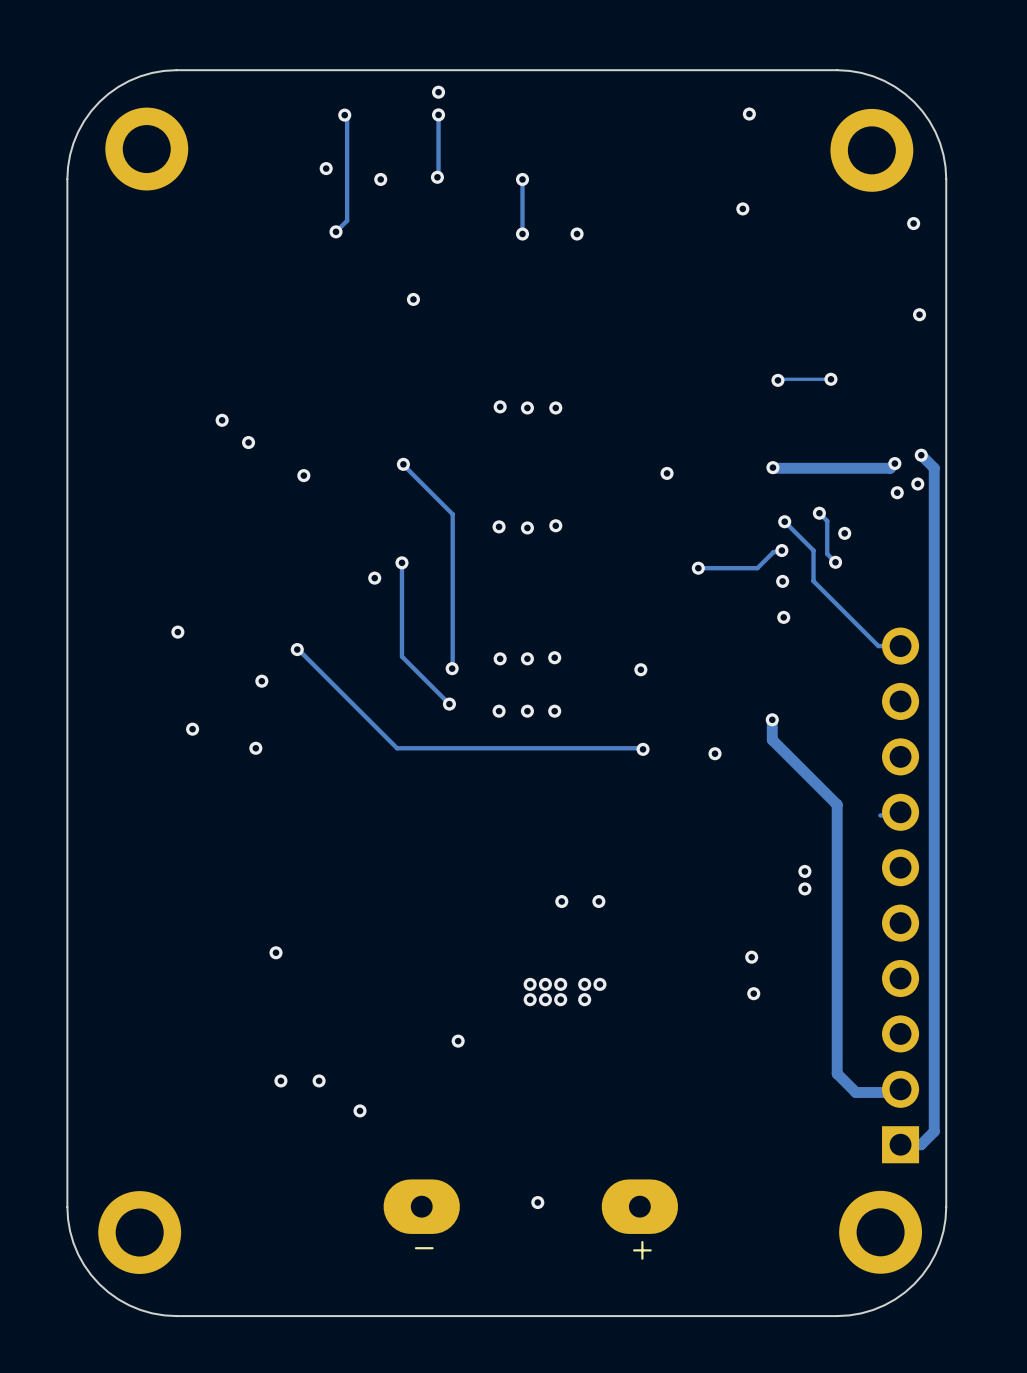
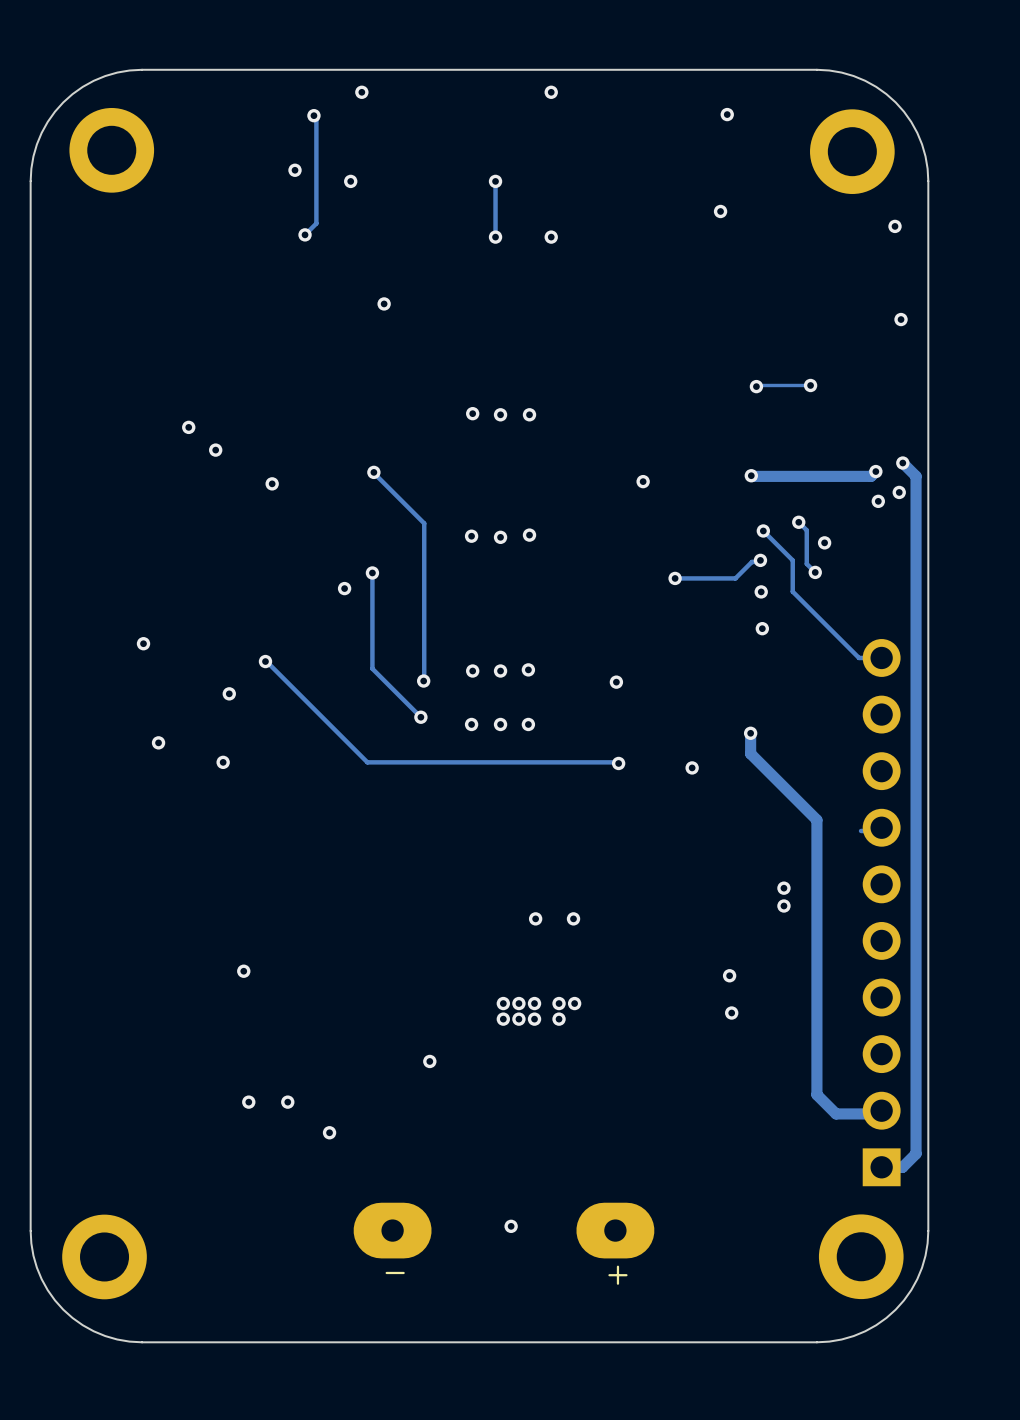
via: none -> (361, 92)
via: (438, 92) -> none
via: none -> (551, 92)
track: (438, 114) (437, 177) -> none
via: (438, 114) -> none
via: (437, 177) -> none

